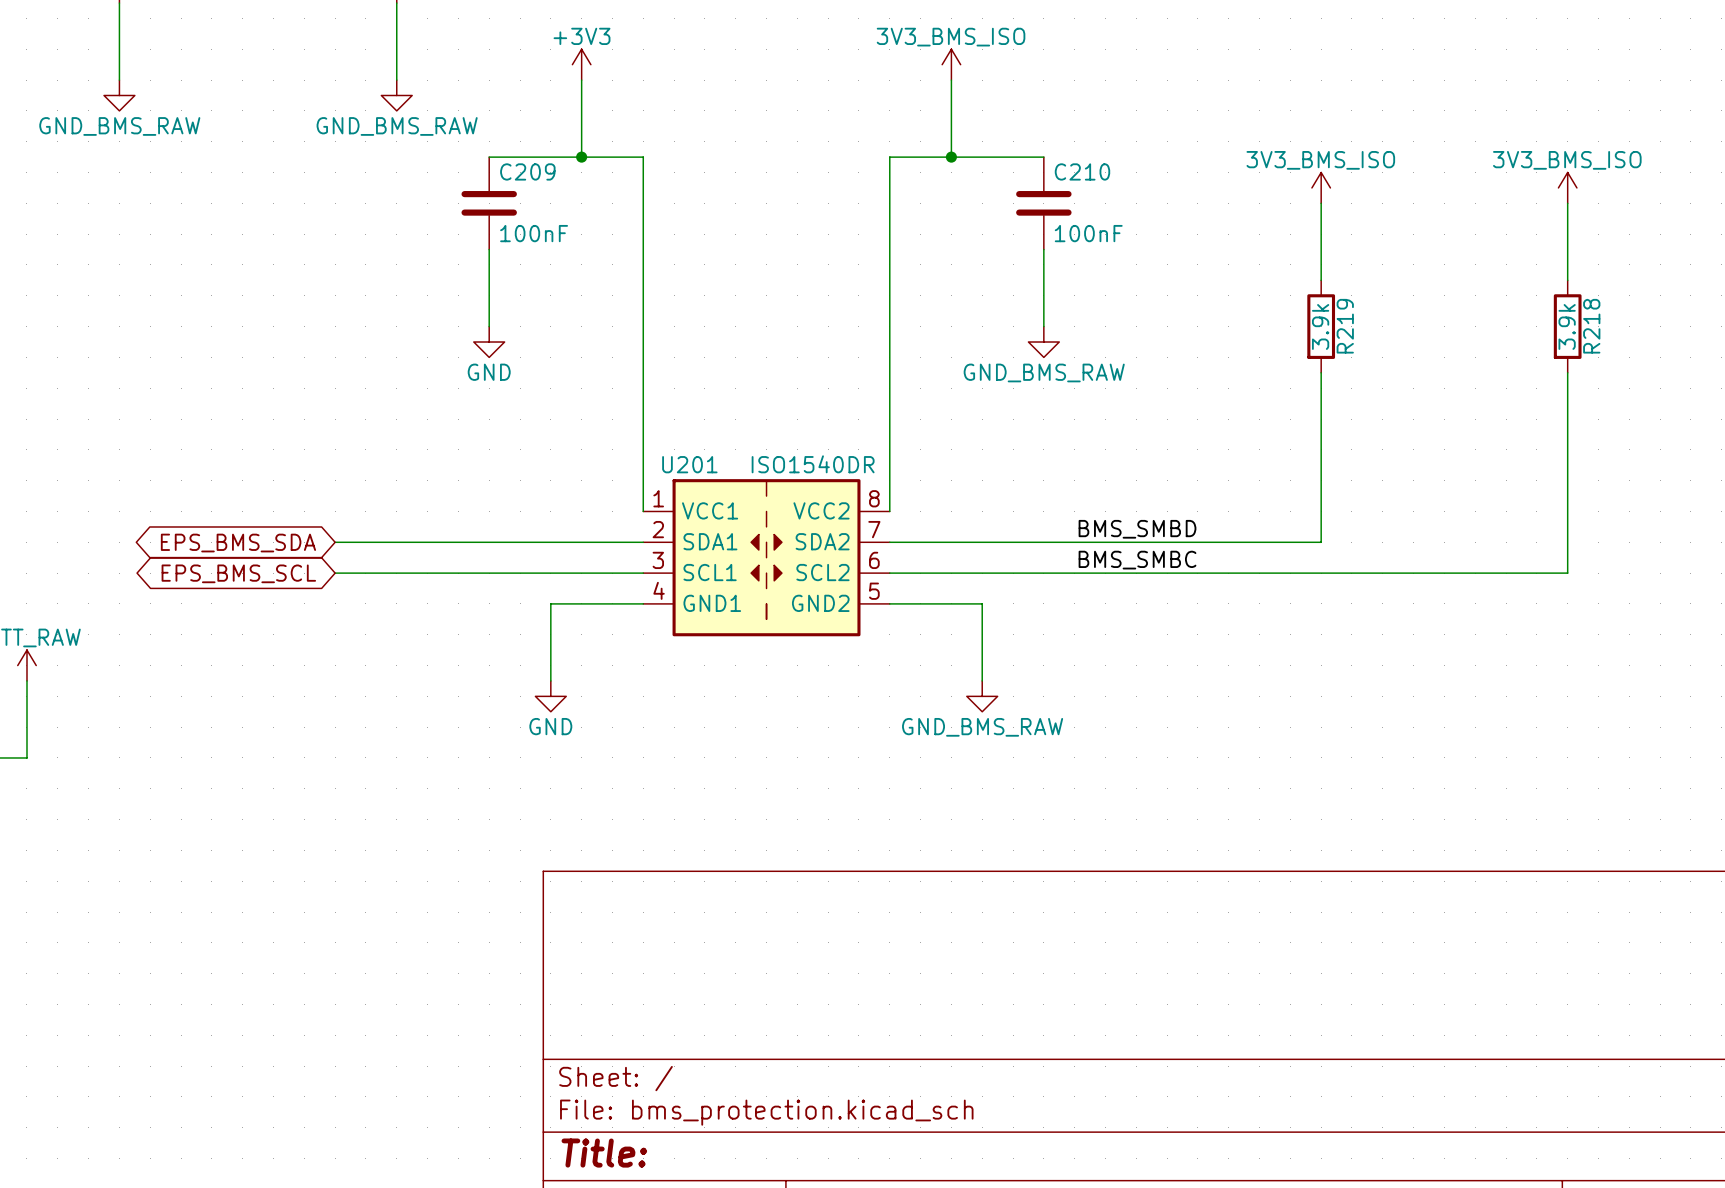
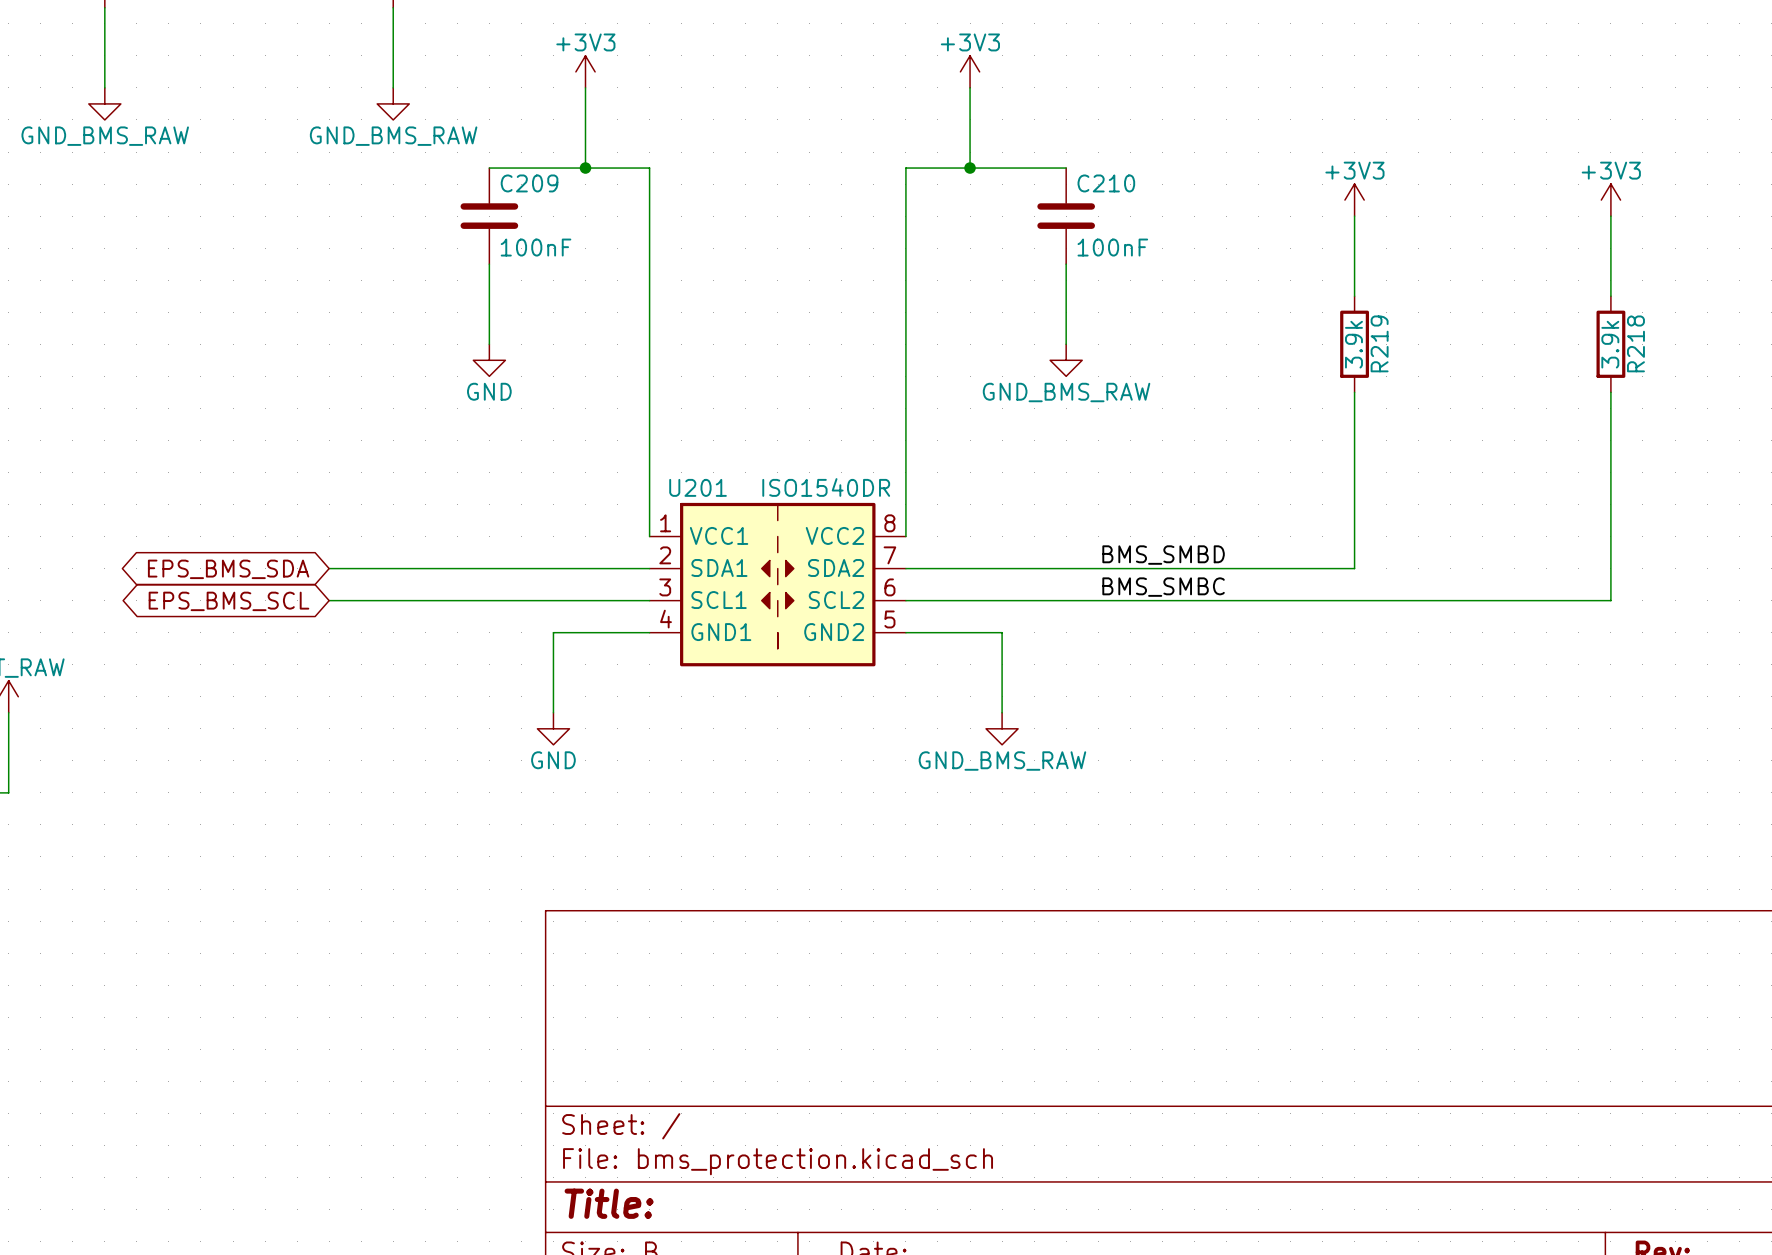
power symbol: 3V3_BMS_ISO (951, 64) -> +3V3 (970, 71)
power symbol: 3V3_BMS_ISO (1321, 187) -> +3V3 (1354, 200)
power symbol: 3V3_BMS_ISO (1567, 187) -> +3V3 (1610, 200)

